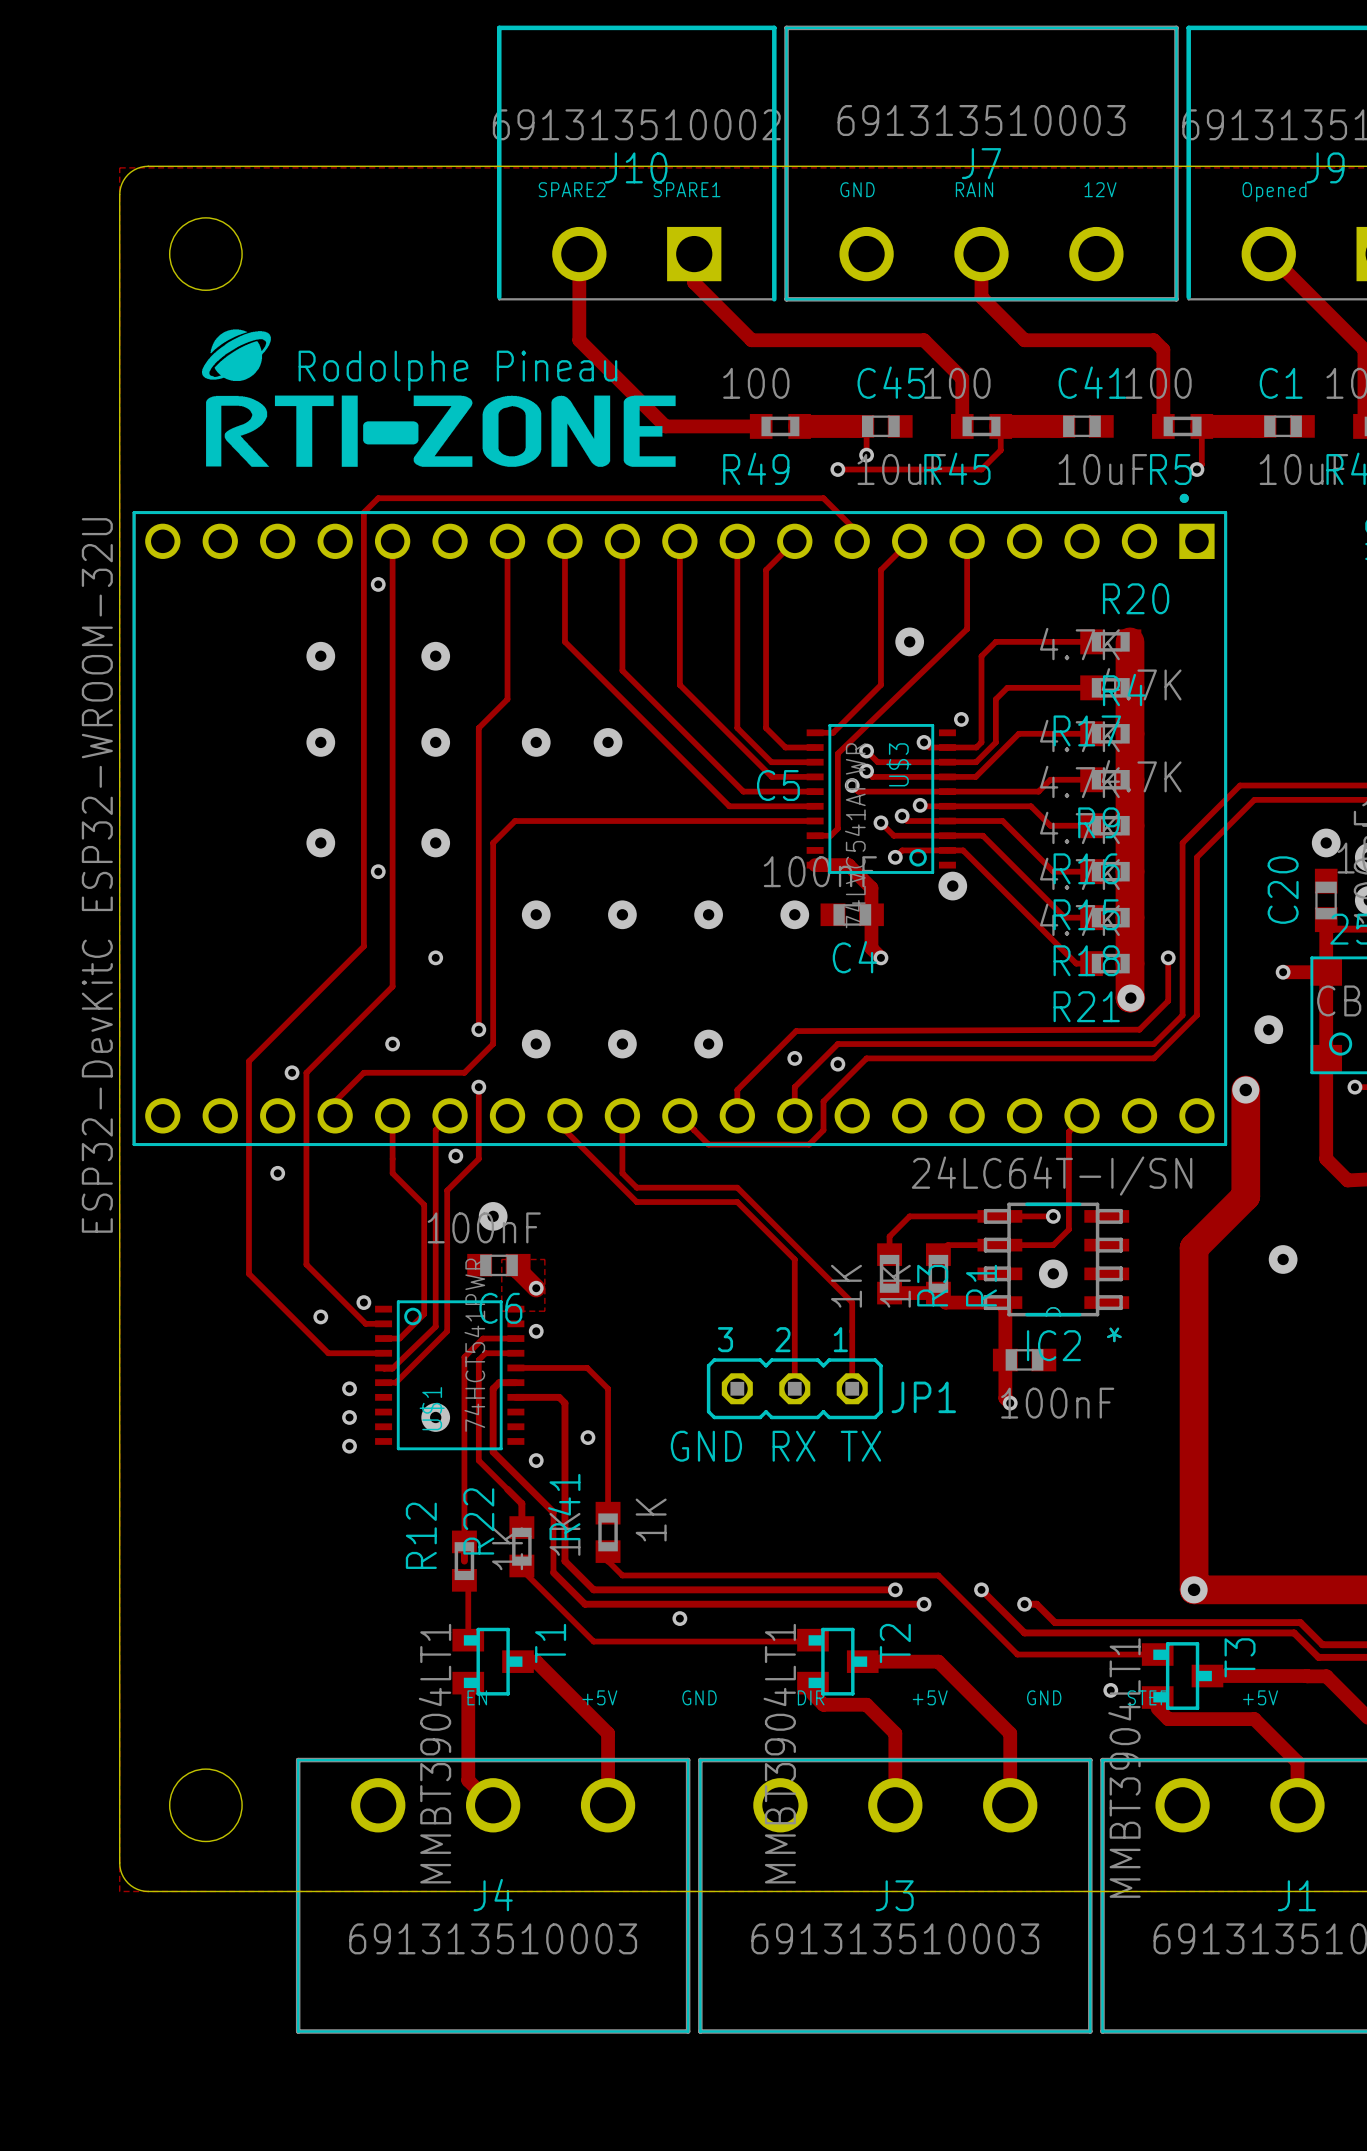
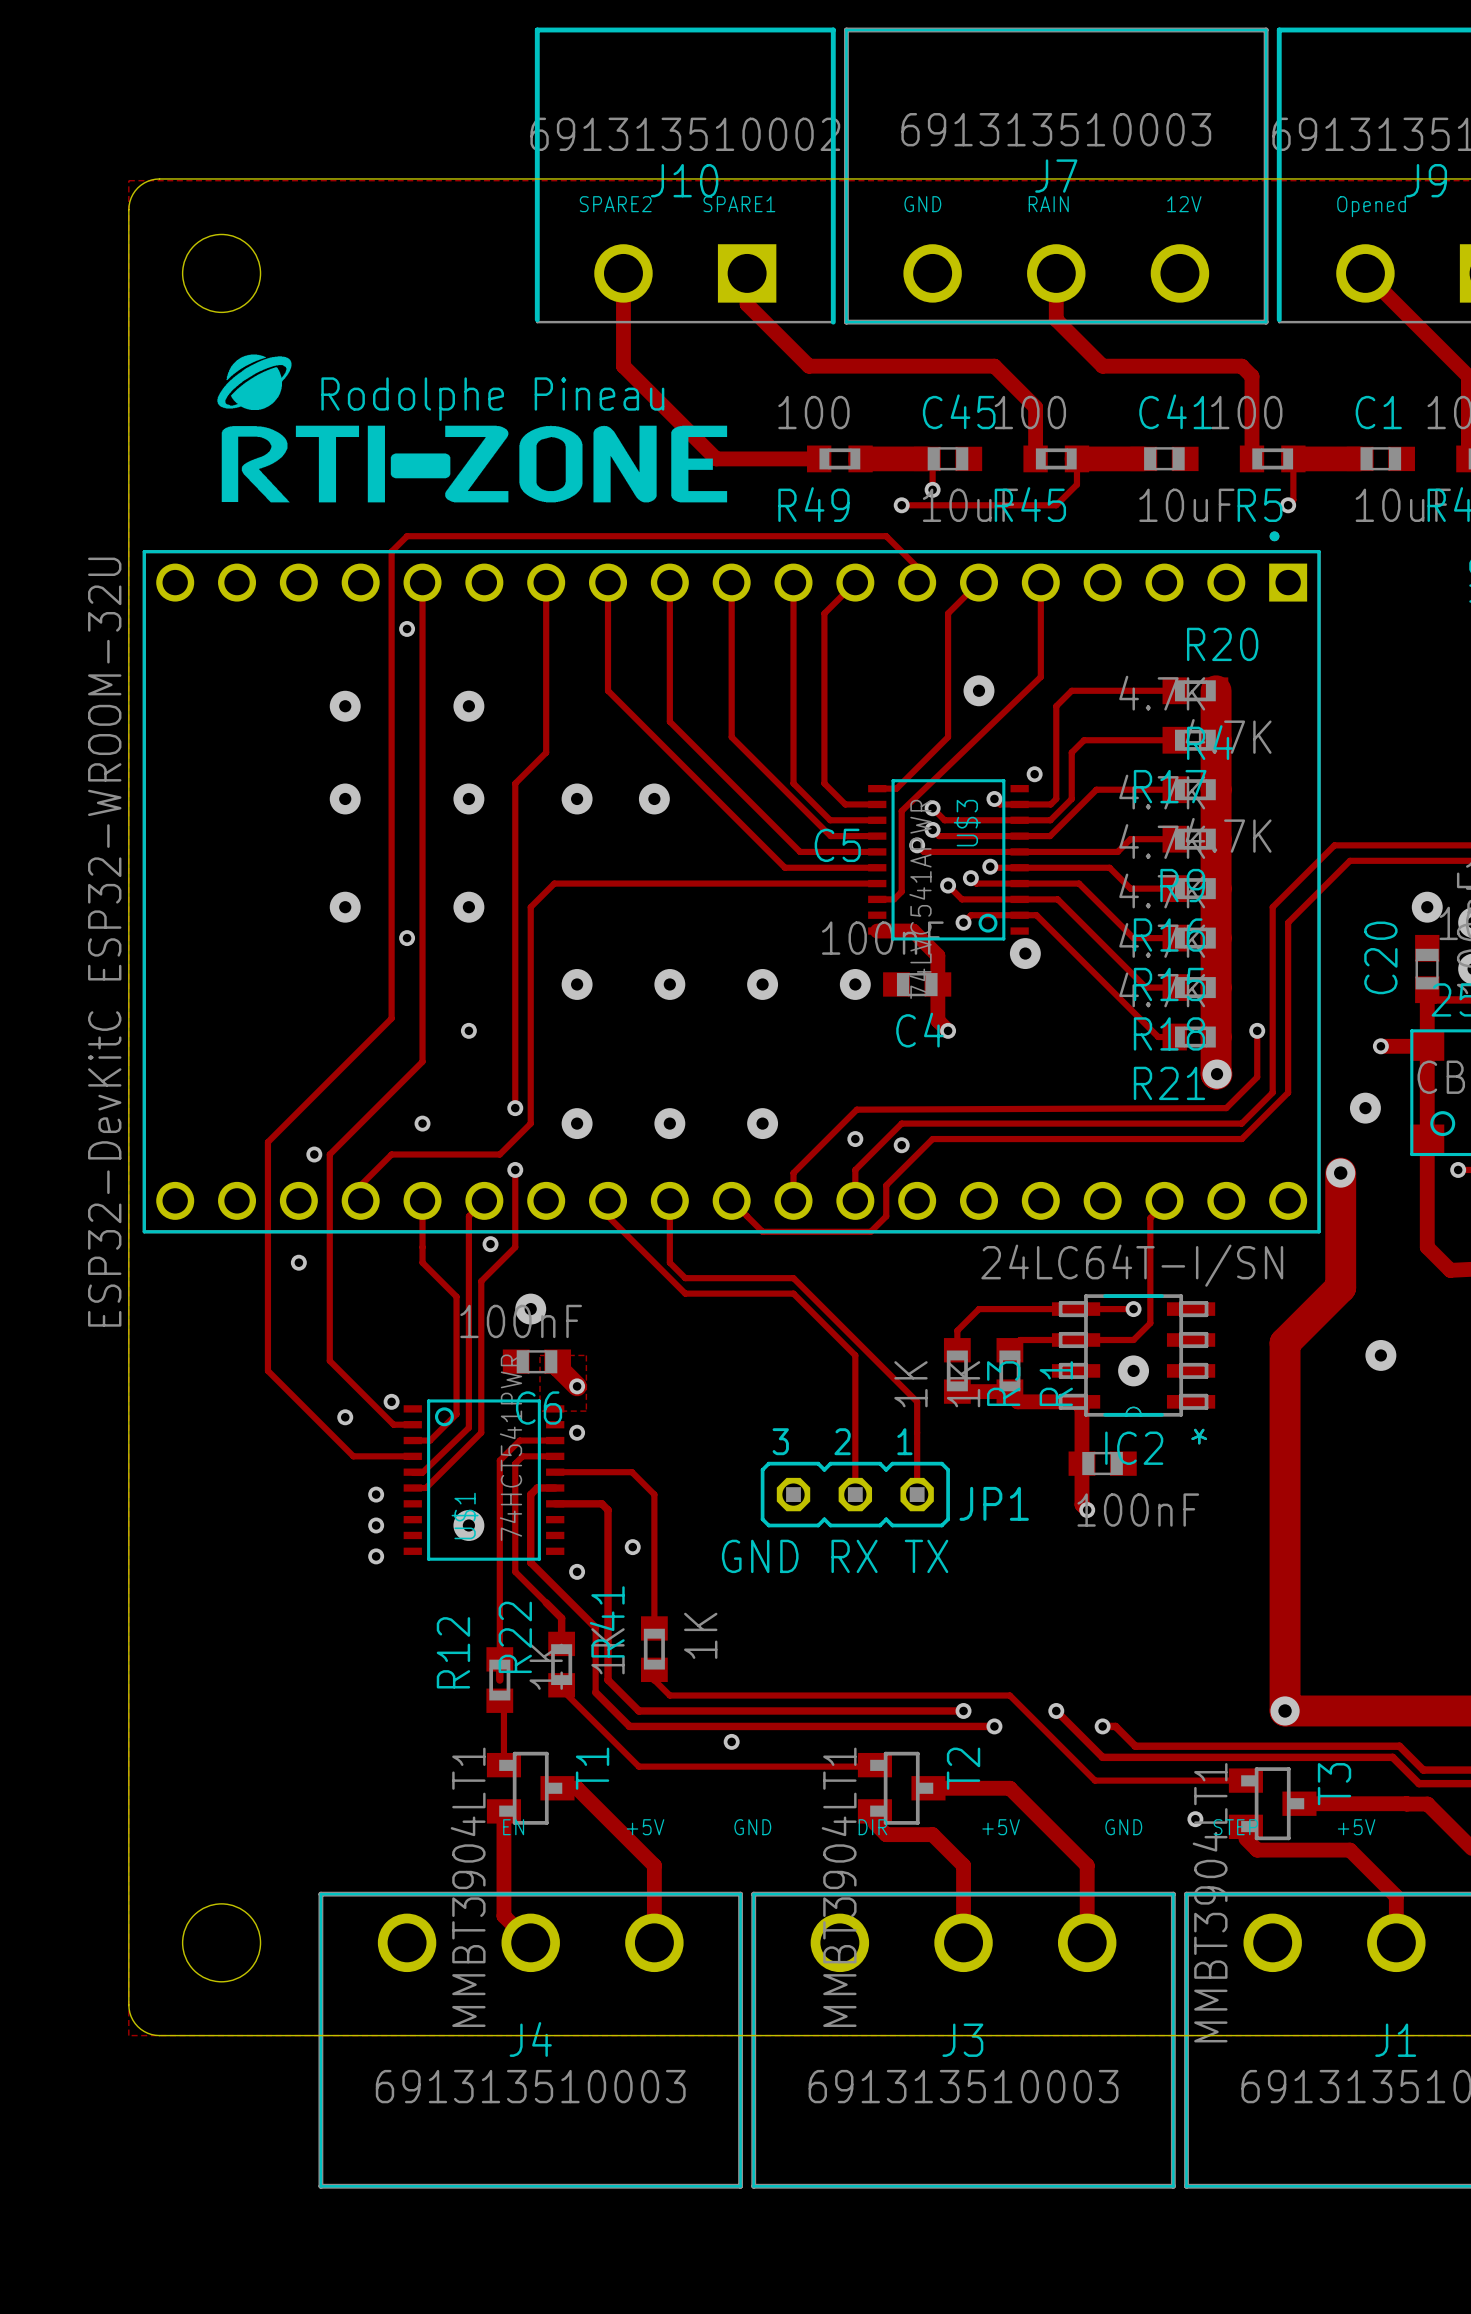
T1 footprint: [452, 1627, 534, 1696] -> [486, 1751, 575, 1825]
T2 footprint: [797, 1627, 879, 1696] -> [857, 1751, 946, 1825]
T3 footprint: [1141, 1642, 1224, 1710] -> [1228, 1767, 1317, 1841]

